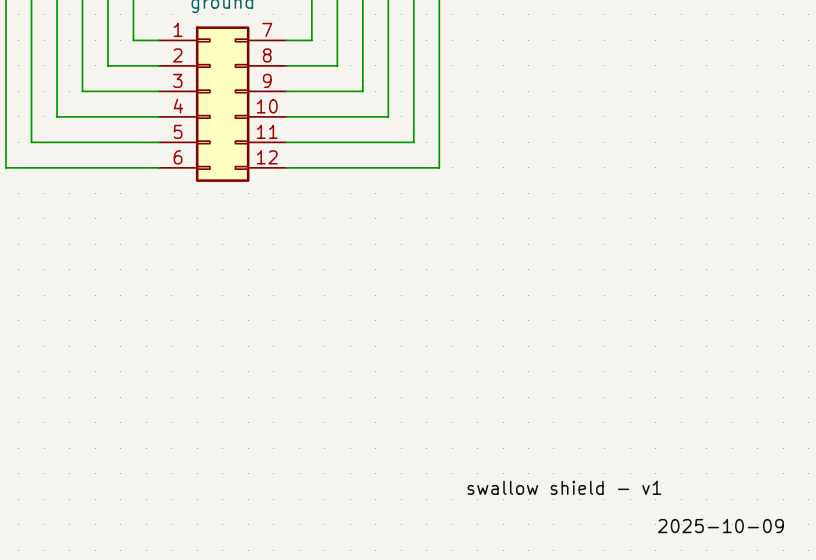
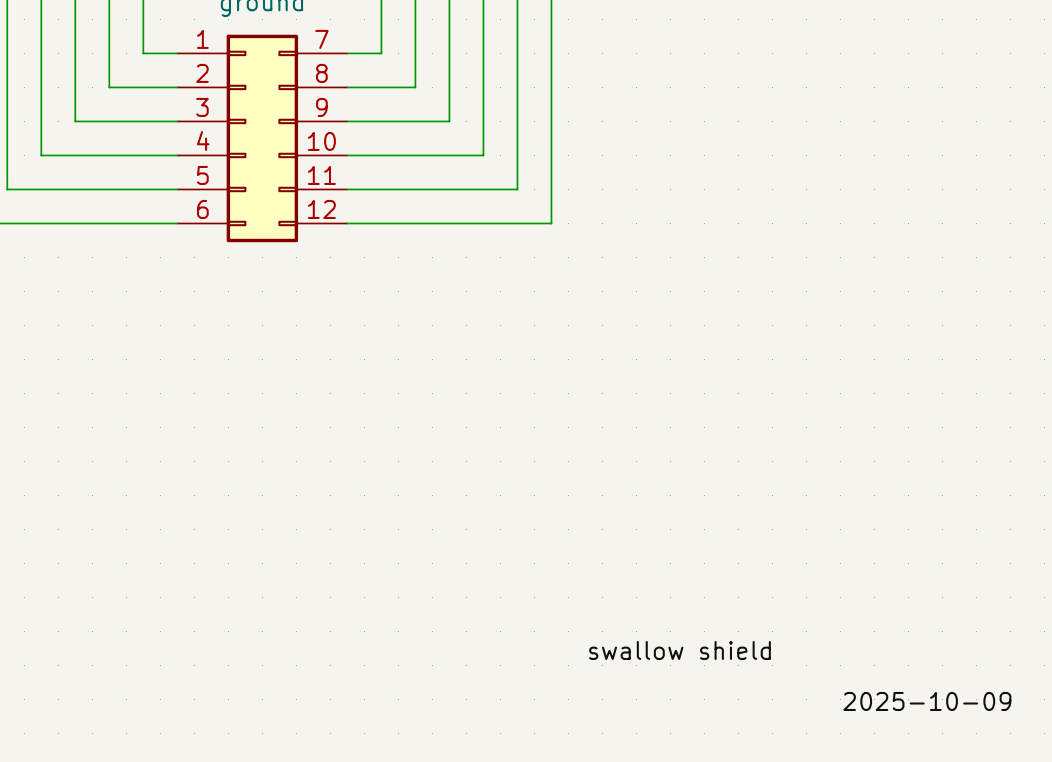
label: swallow shield - v1 (564, 487) -> swallow shield (679, 650)

